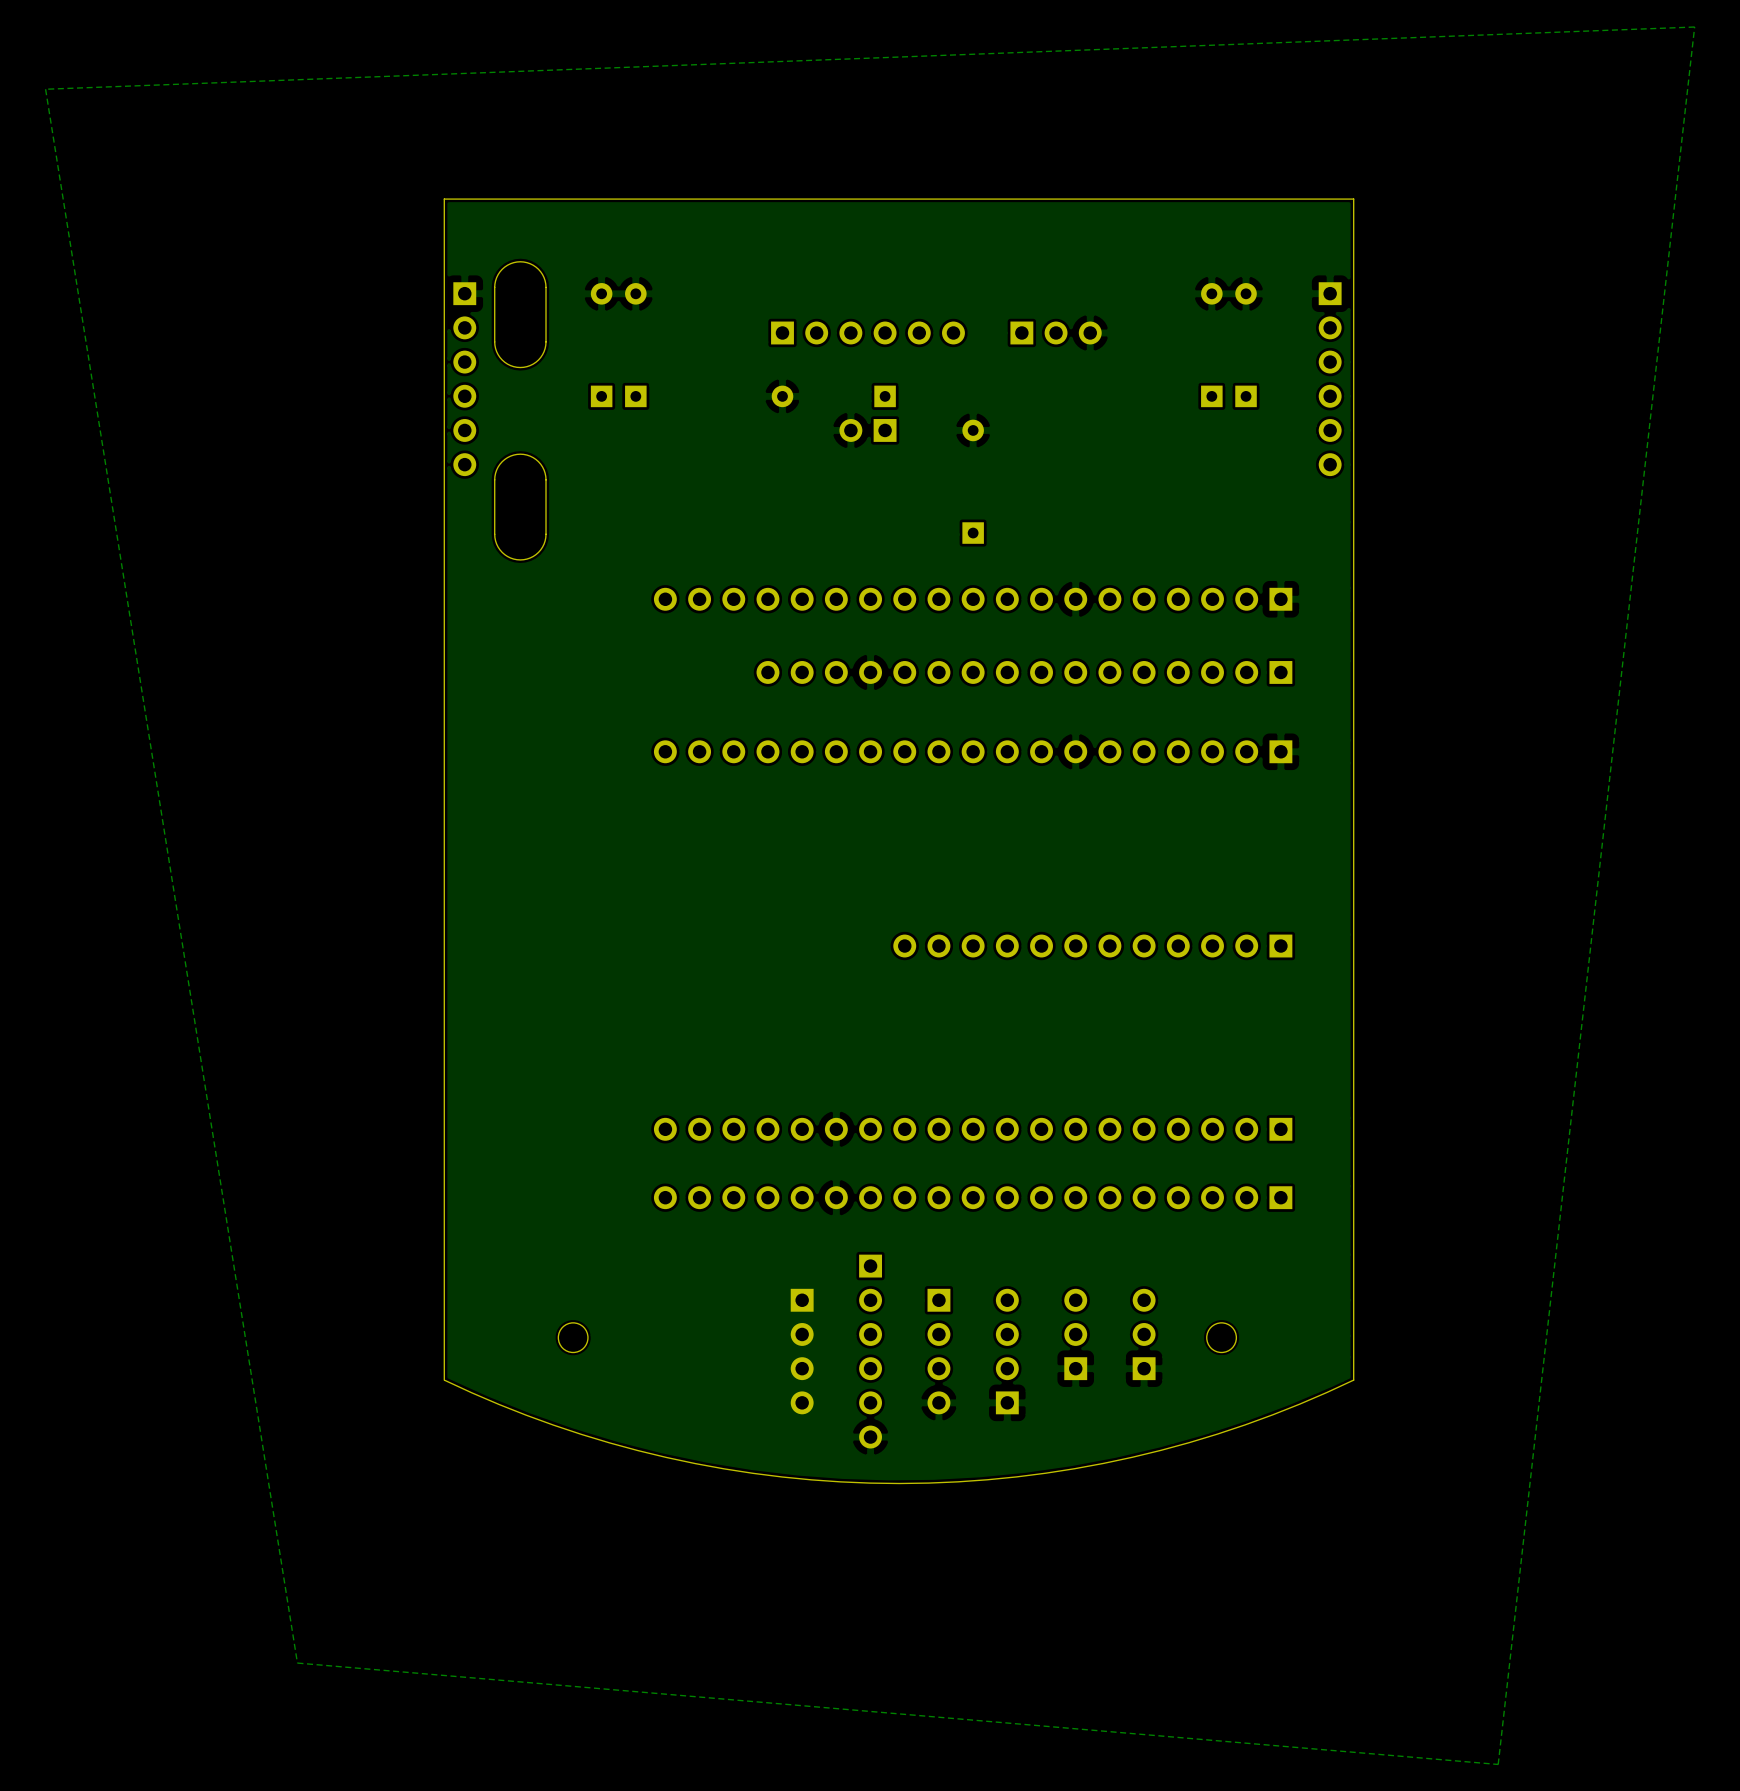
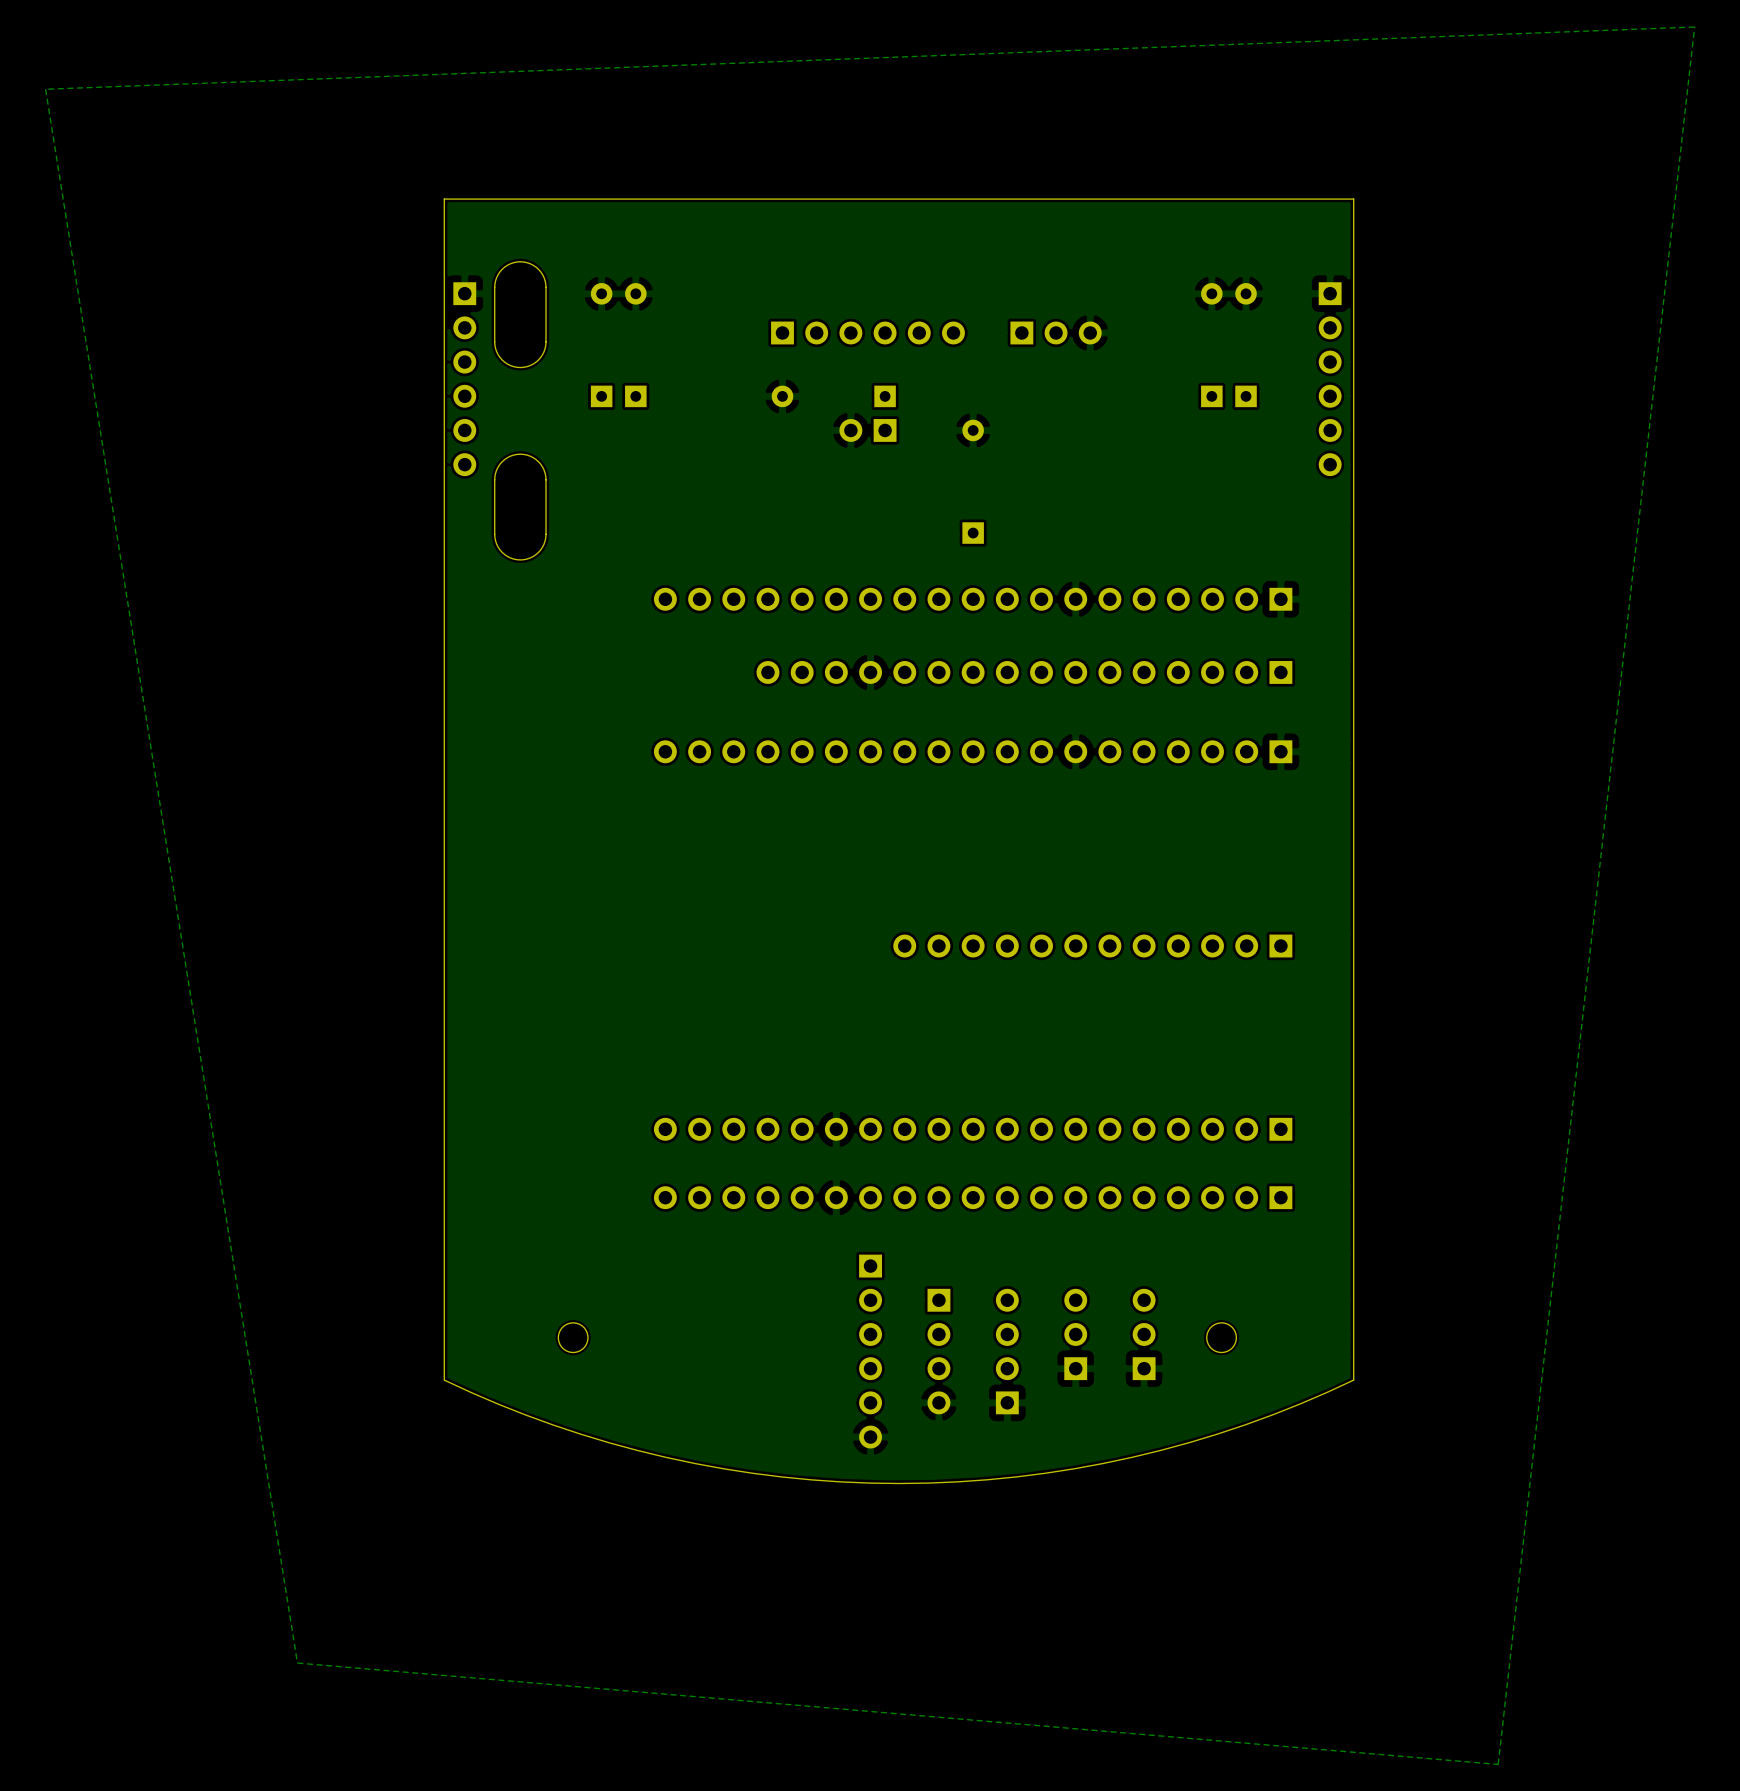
part: (802, 1351) -> none

